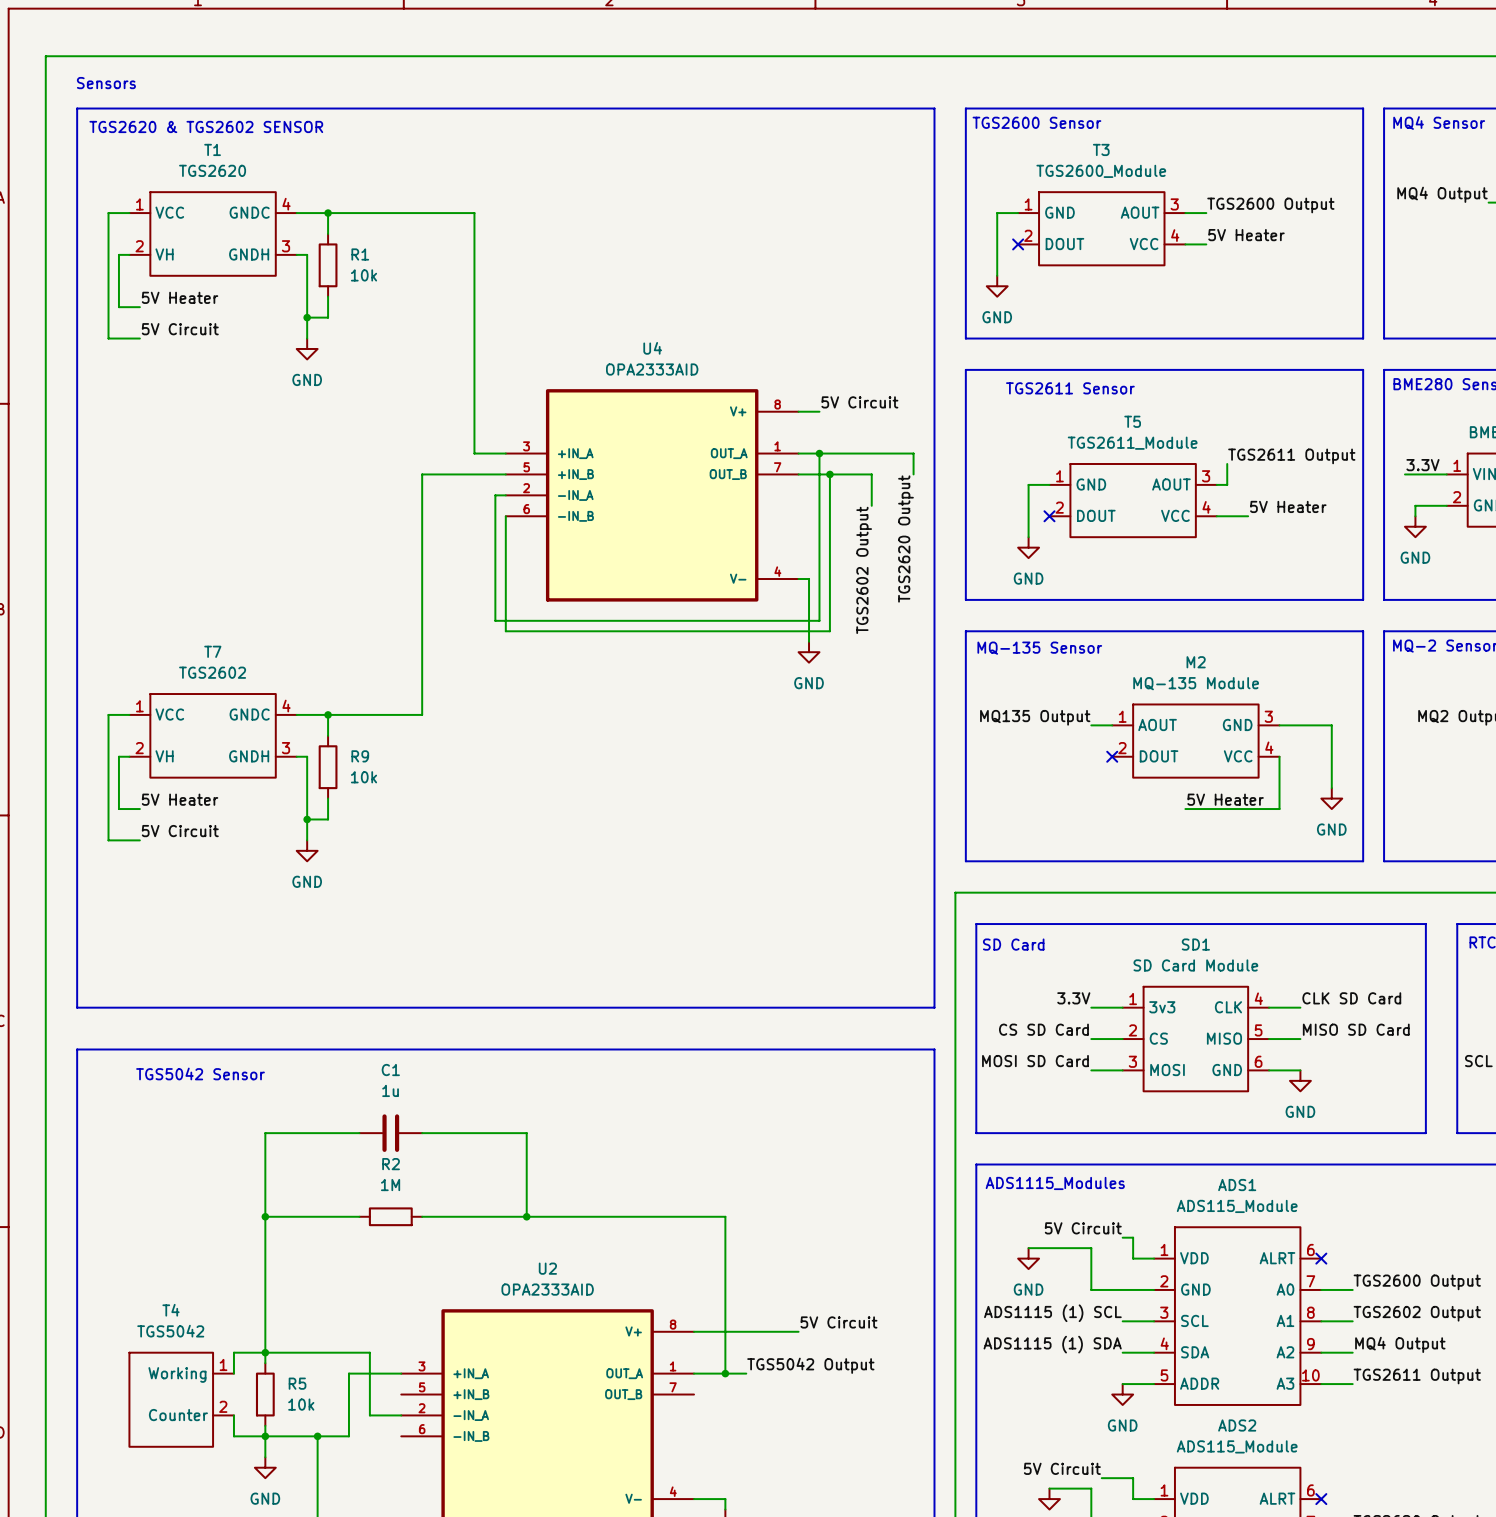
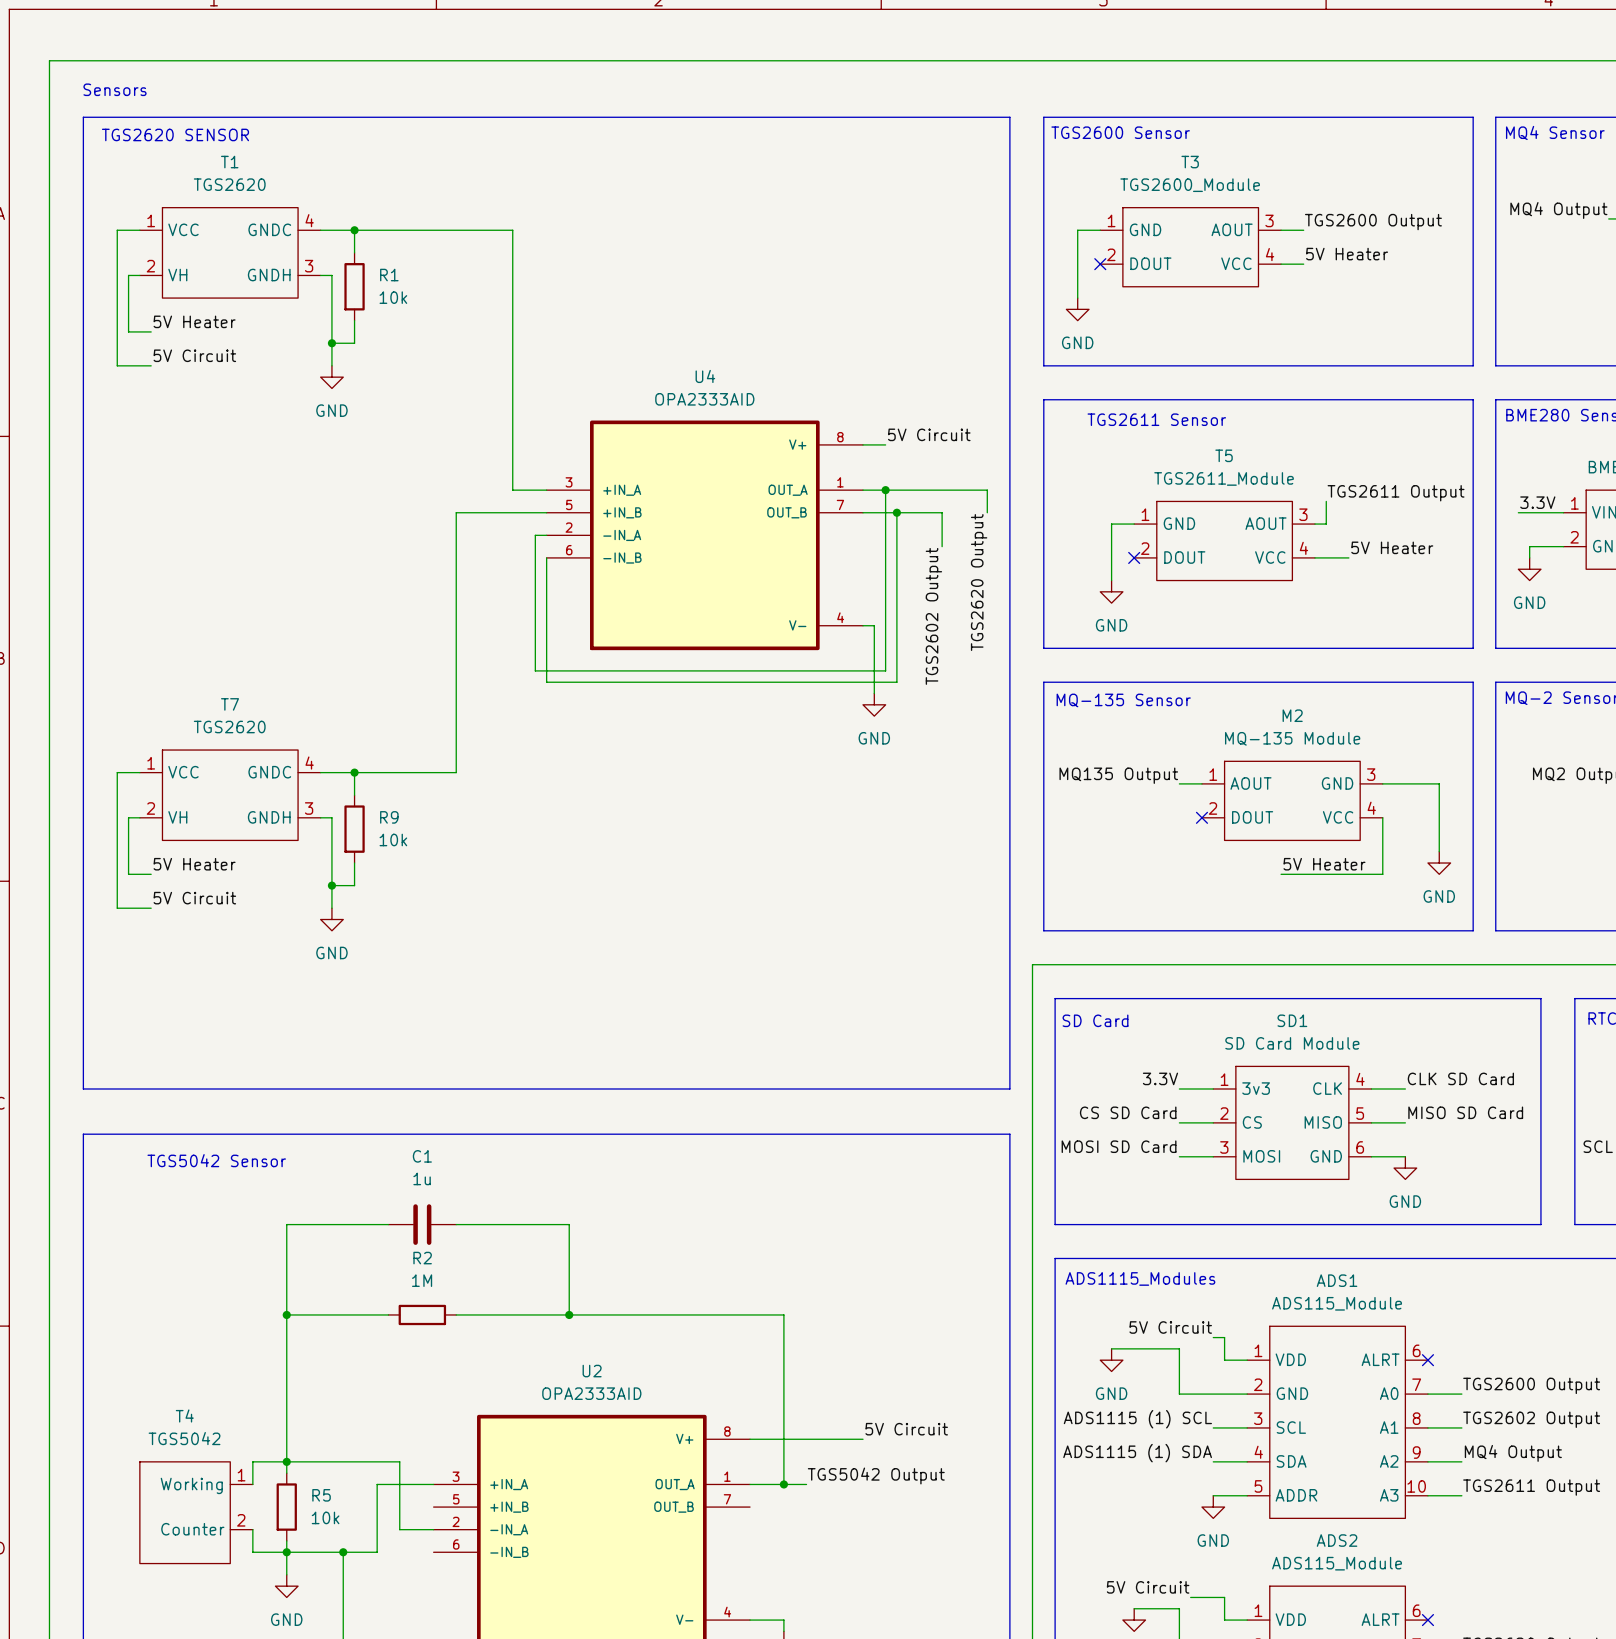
text: TGS2620 & TGS2602 SENSOR (206, 126) -> TGS2620 SENSOR (175, 134)
T7 value: TGS2602 (212, 672) -> TGS2620 (229, 727)

